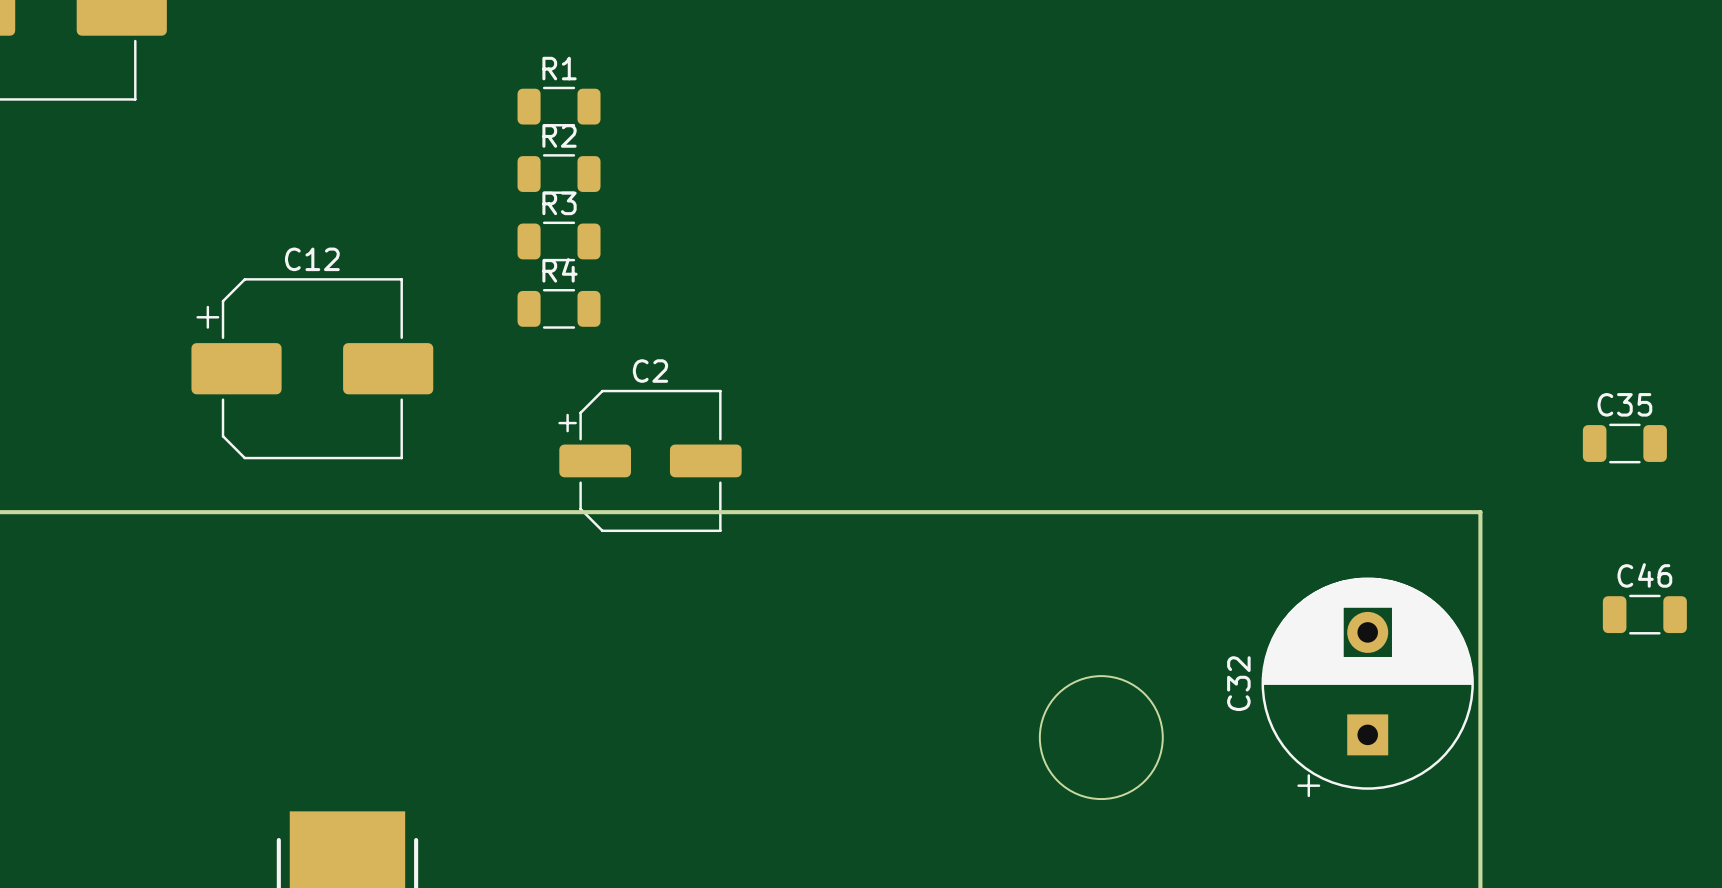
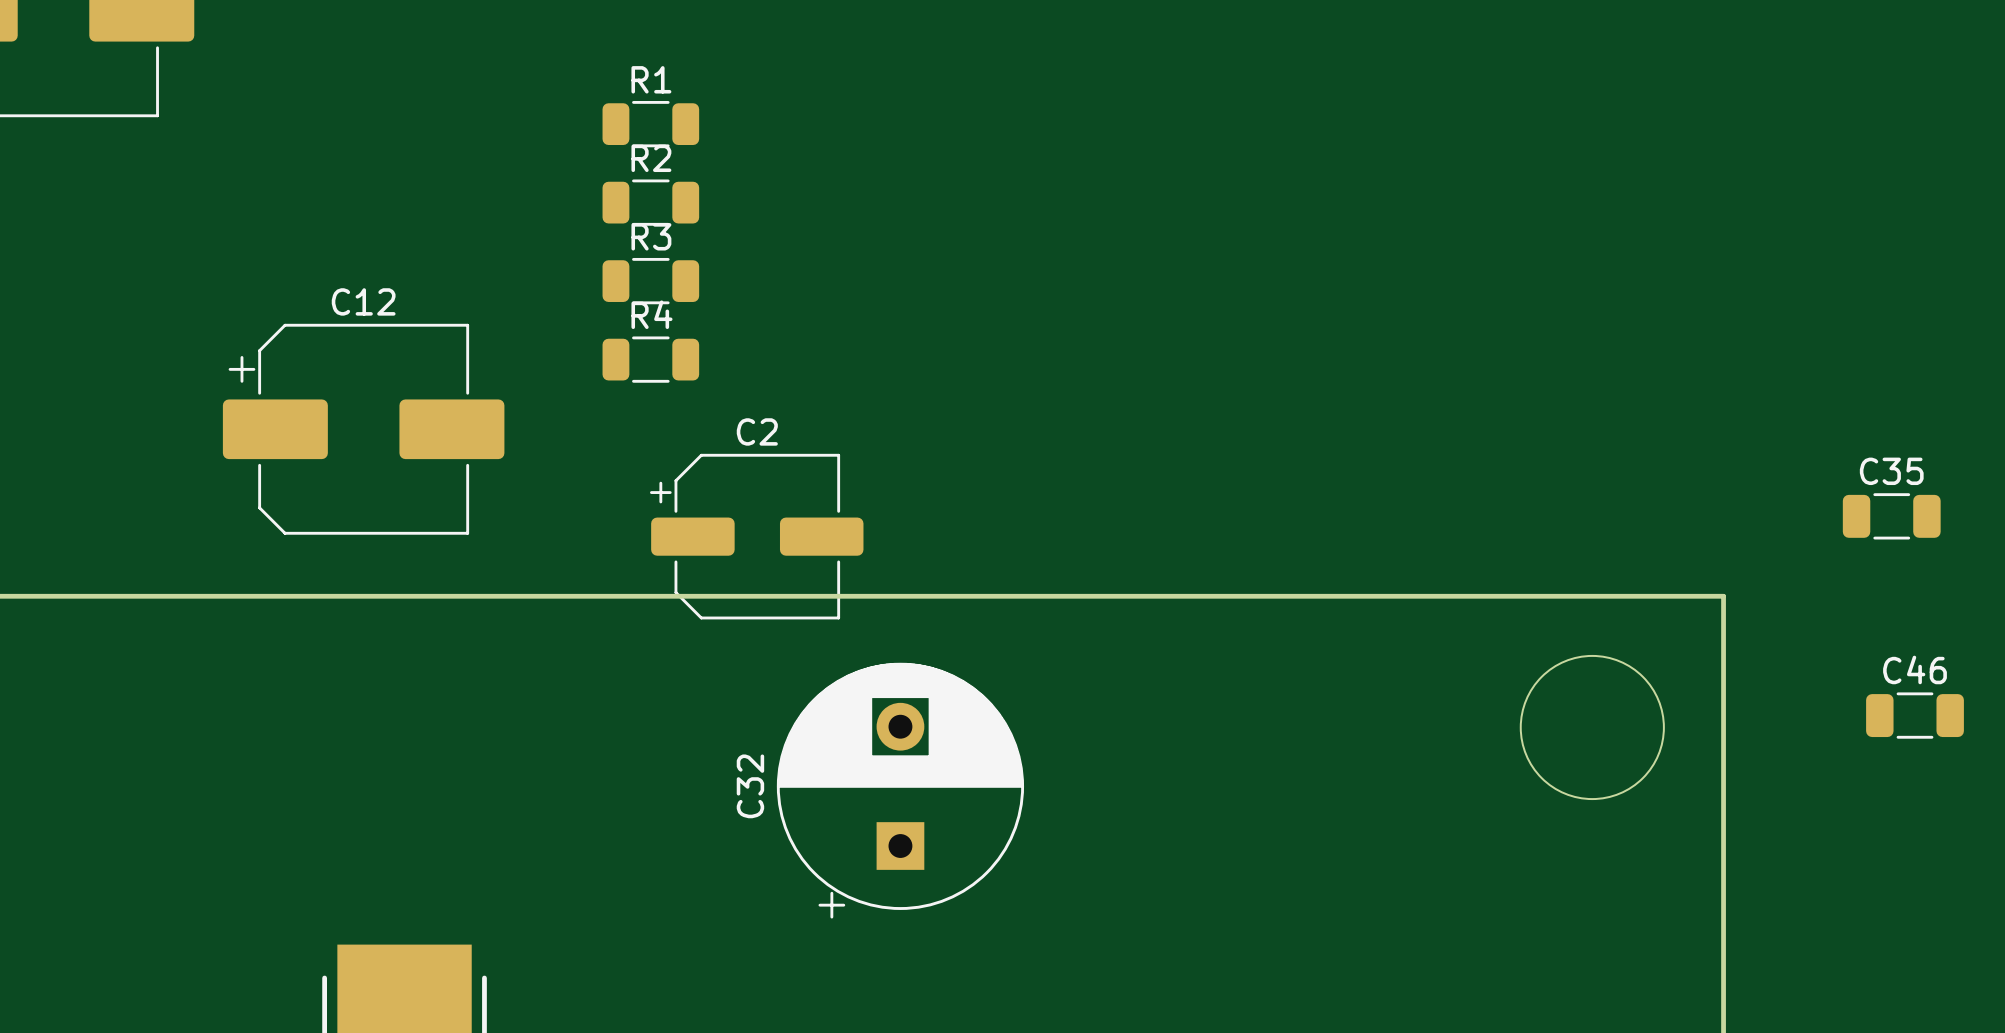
C32 position: (1367, 687) -> (900, 790)
round board edge position: (1101, 737) -> (1592, 727)

